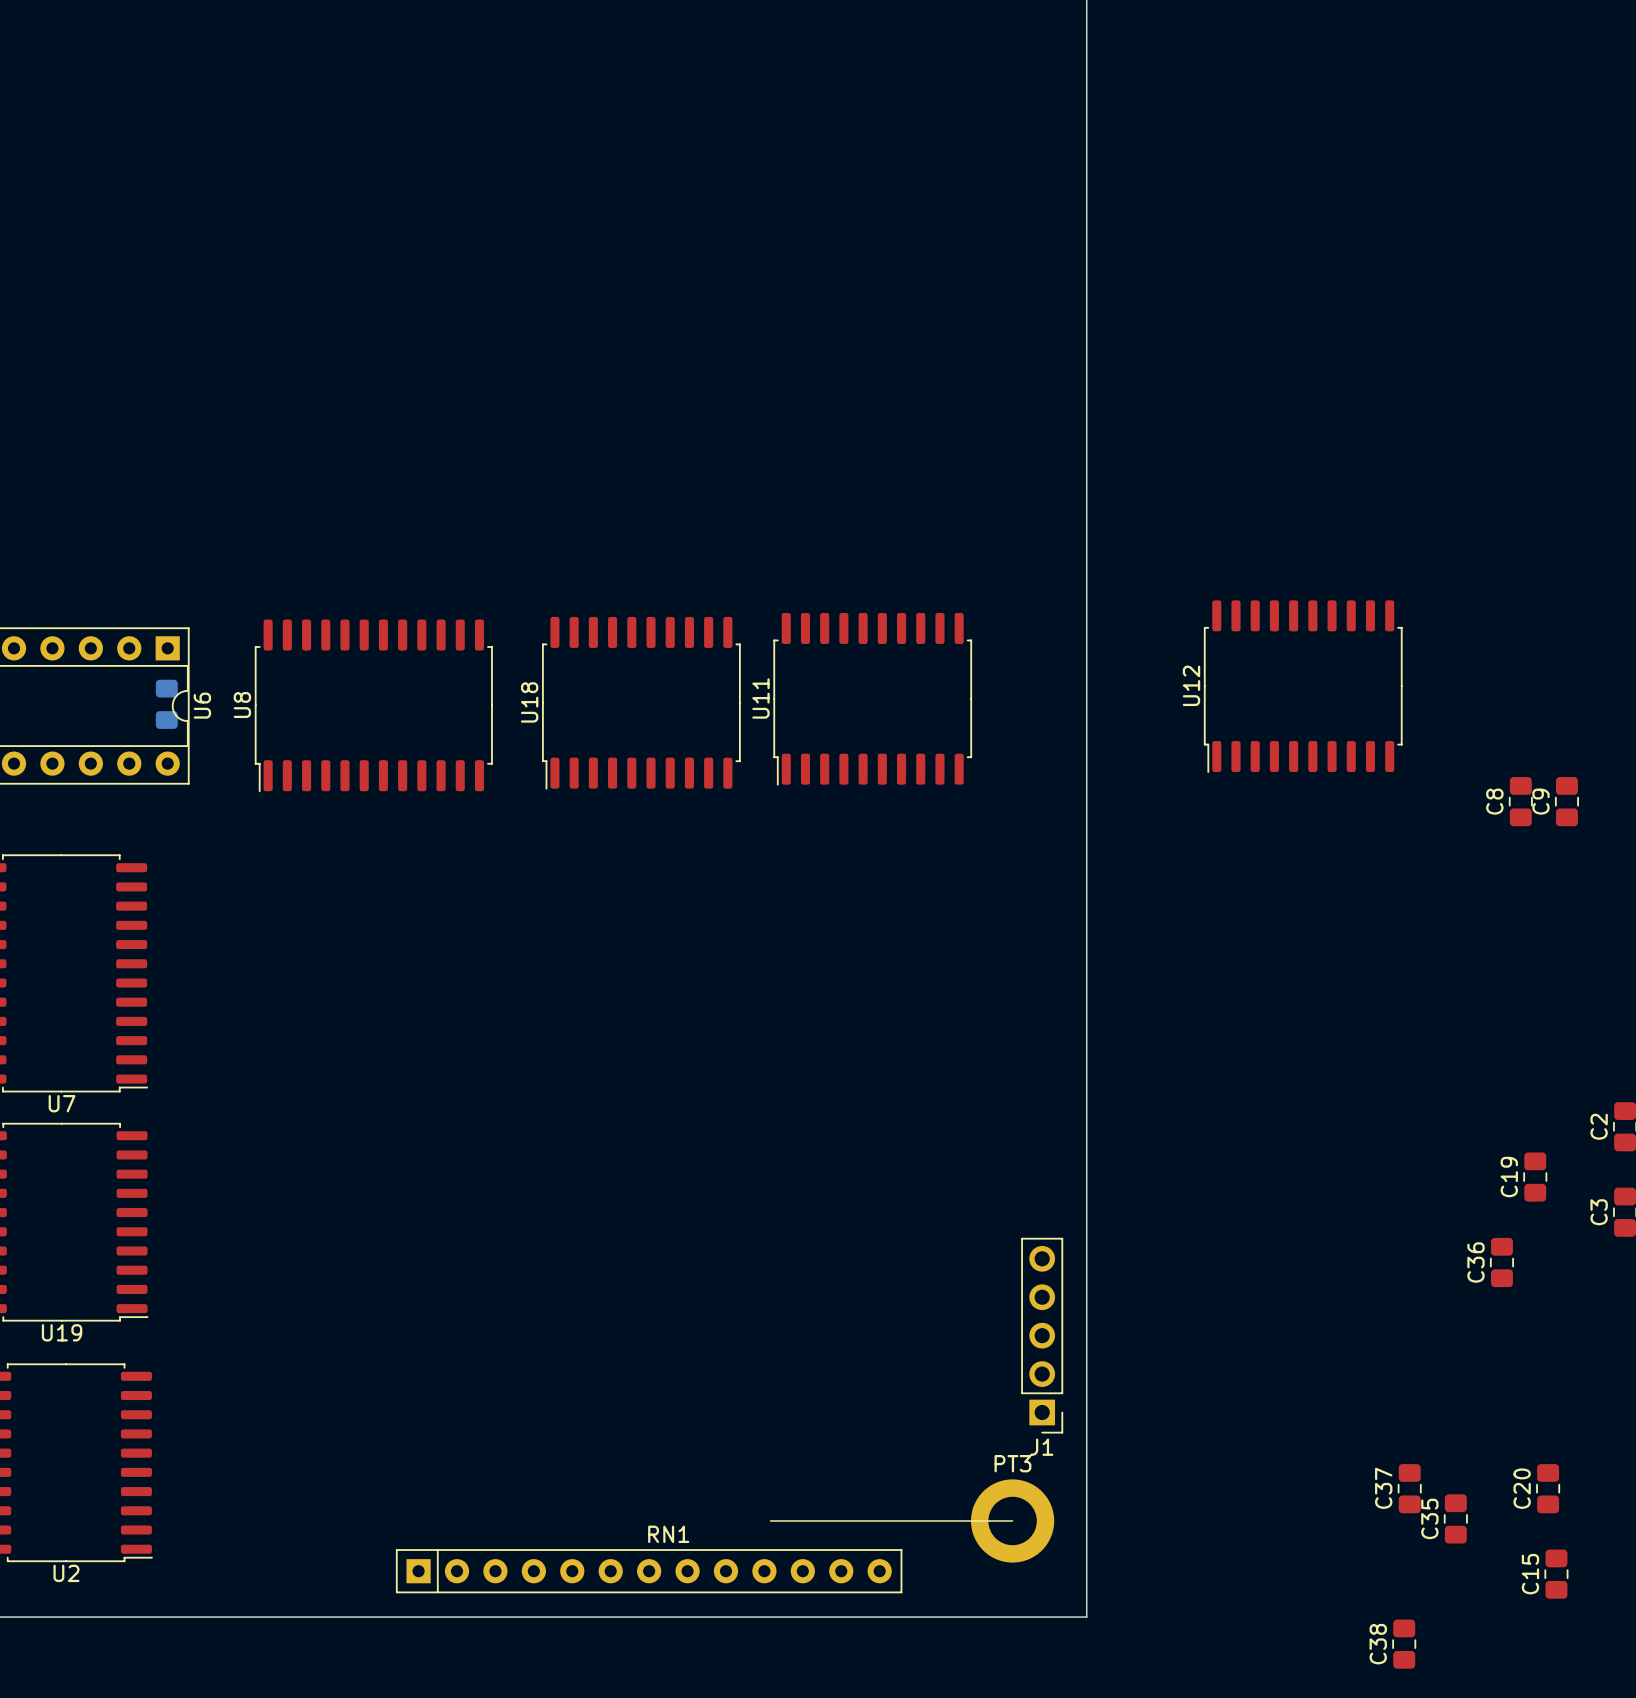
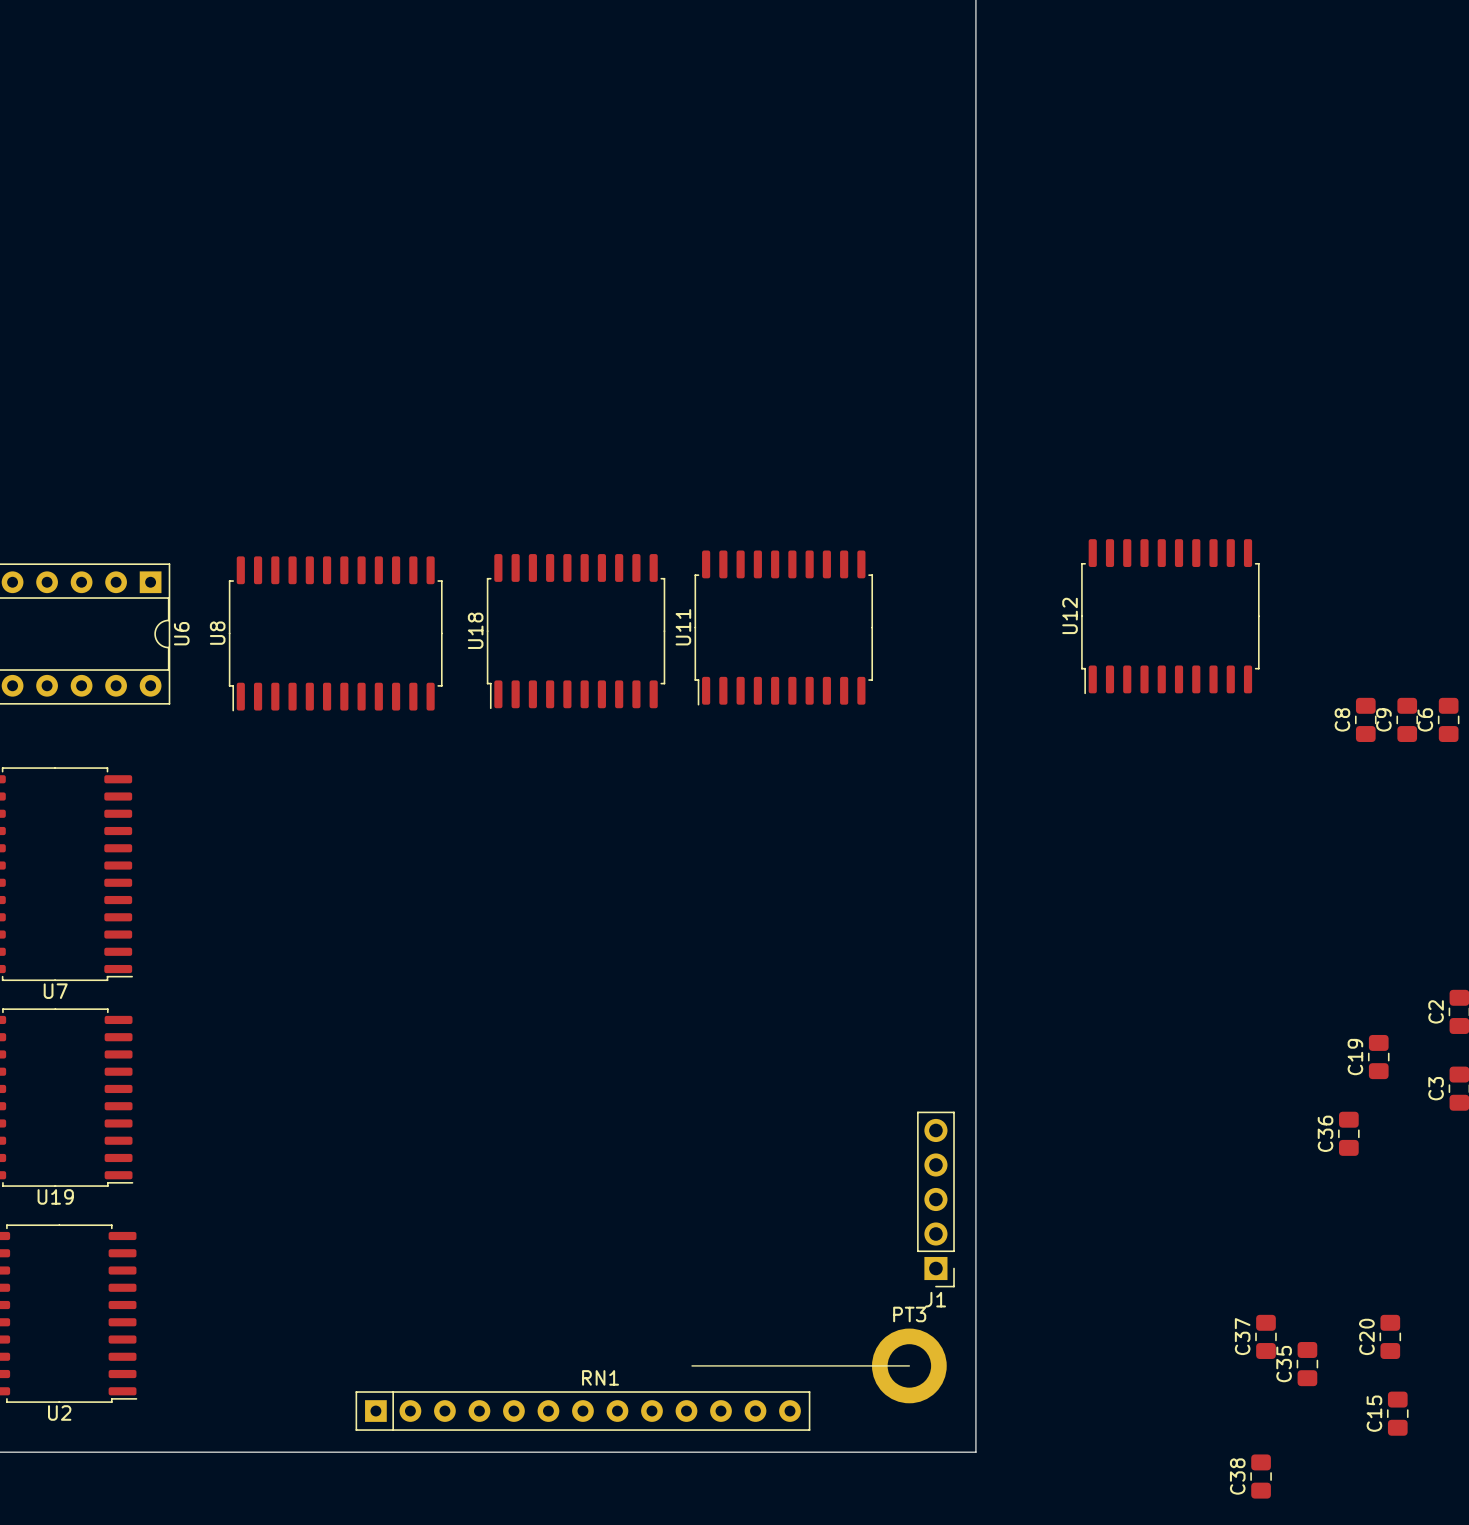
part: (166, 704) -> none
C6: none -> (1448, 719)

